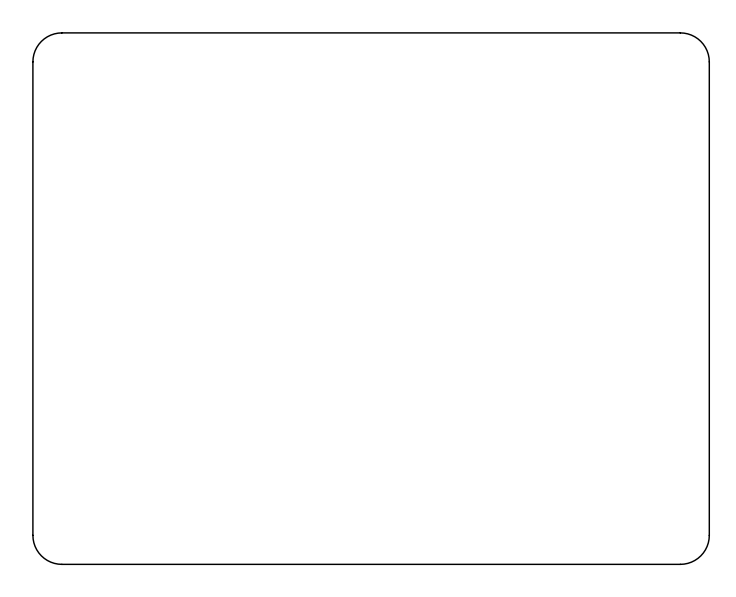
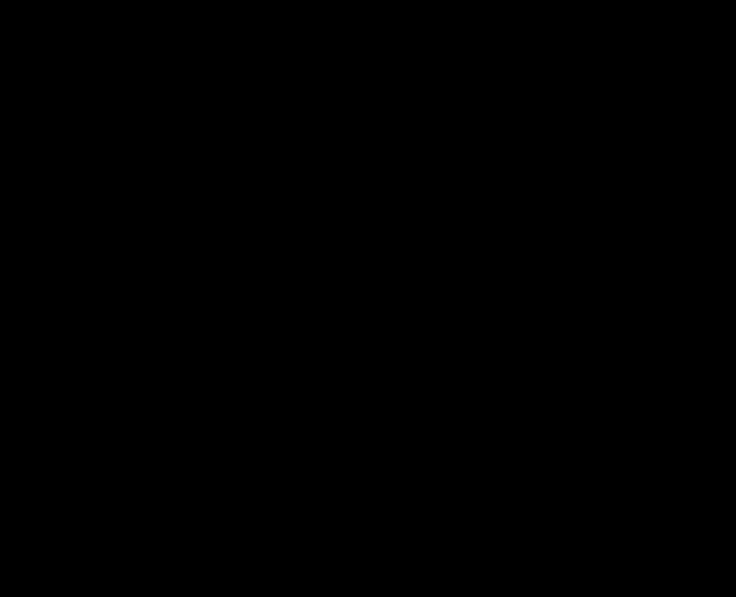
board edge: (61, 32) (680, 32) (697, 38) (705, 47) (709, 61) (709, 535) (703, 553) (691, 562) (680, 564) (61, 564) (44, 558) (35, 546) (32, 535) (32, 61) (35, 50) (41, 41) (50, 35) (61, 32) -> none

